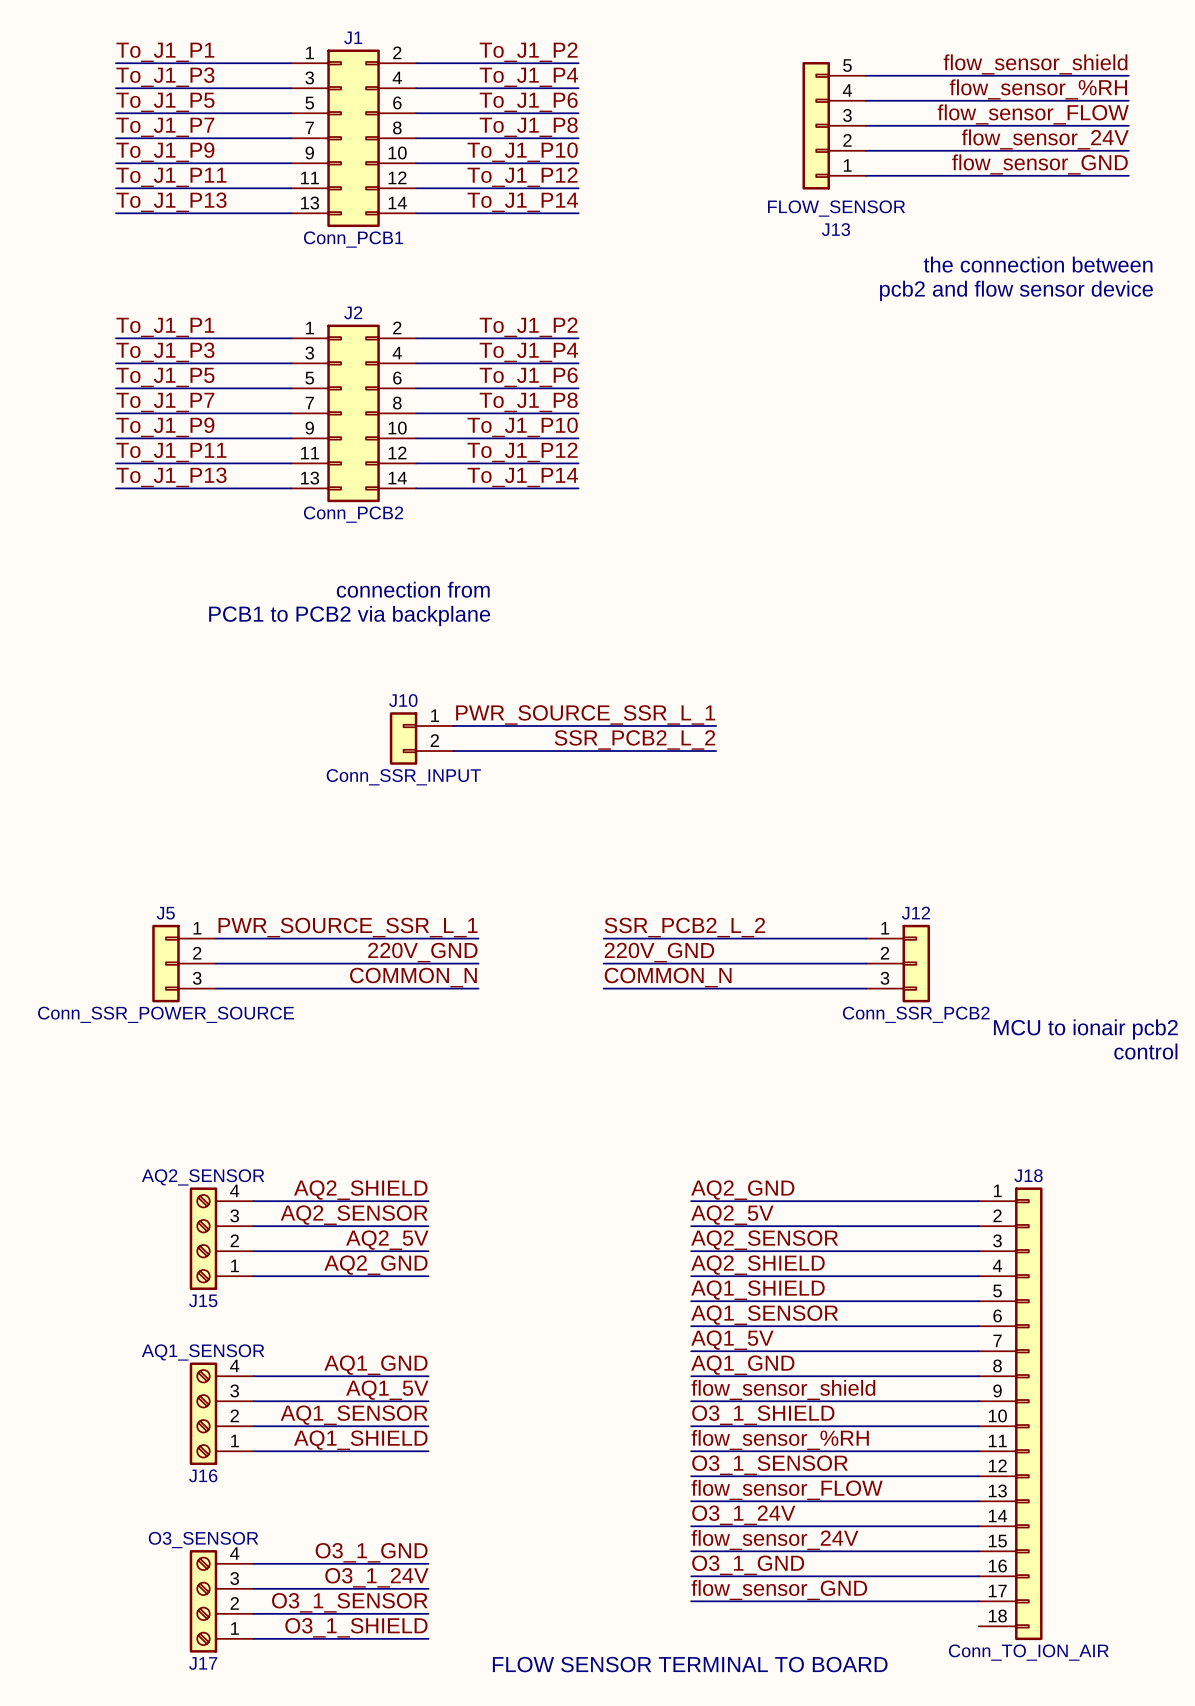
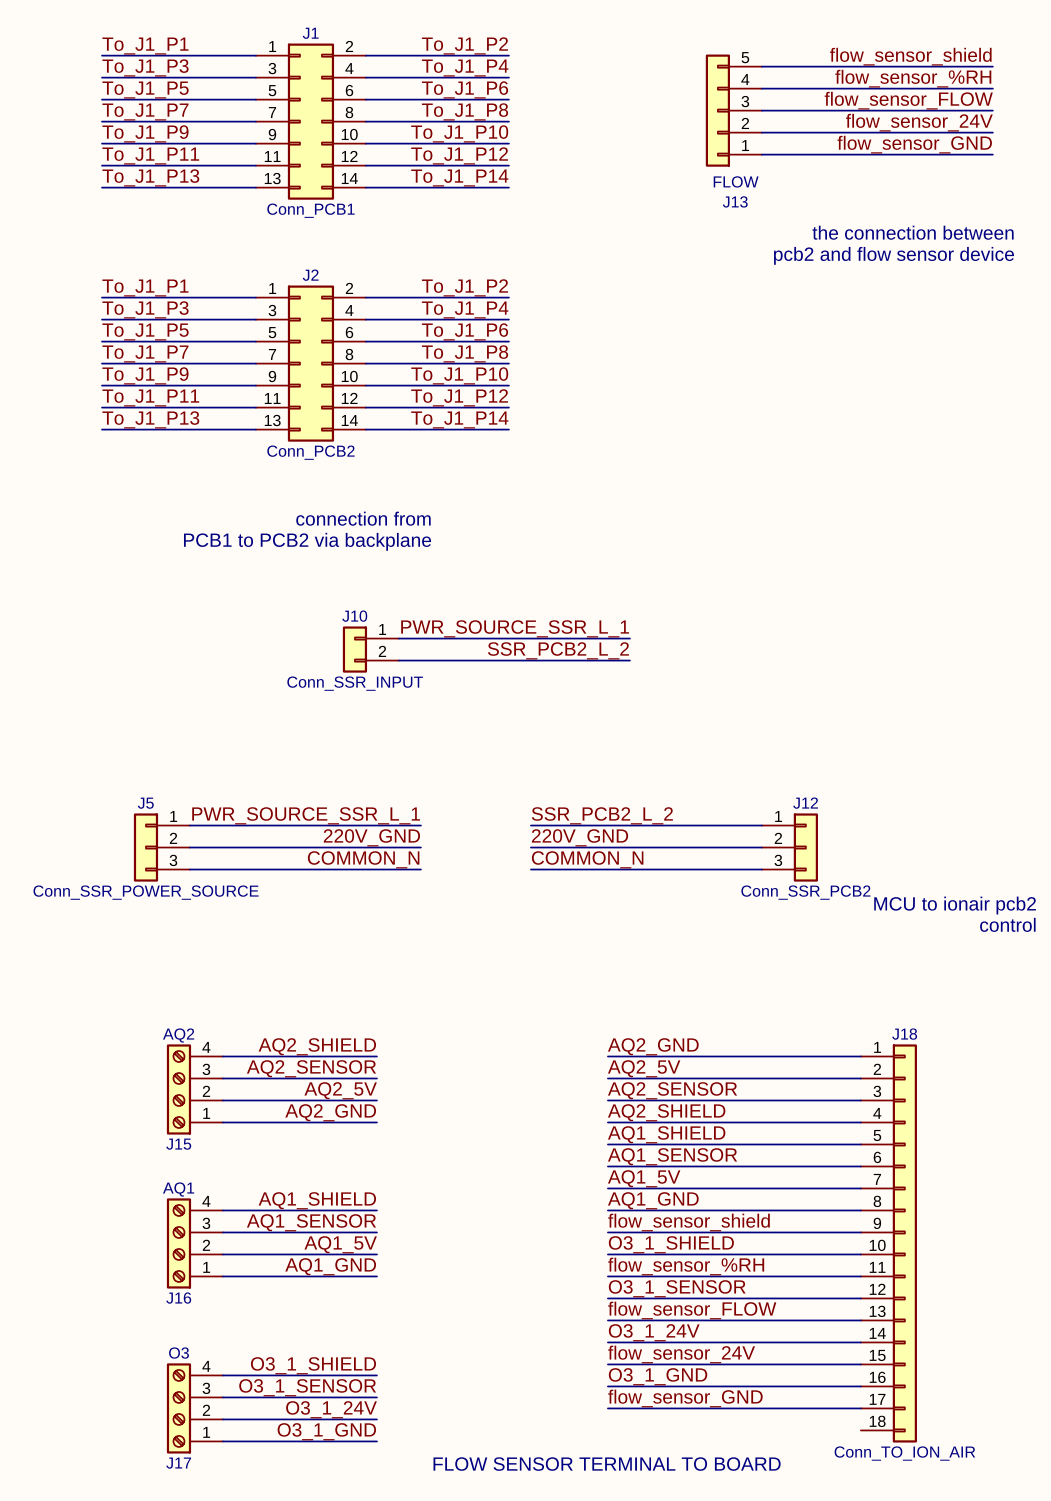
J13 value: FLOW_SENSOR (836, 208) -> FLOW (736, 181)
J15 value: AQ2_SENSOR (203, 1177) -> AQ2 (178, 1035)
J16 value: AQ1_SENSOR (203, 1352) -> AQ1 (178, 1189)
label: AQ1_GND (375, 1365) -> AQ1_SHIELD (317, 1200)
label: AQ1_5V (387, 1390) -> AQ1_SENSOR (311, 1222)
label: AQ1_SENSOR (354, 1415) -> AQ1_5V (340, 1244)
label: AQ1_SHIELD (360, 1440) -> AQ1_GND (330, 1266)
J17 value: O3_SENSOR (203, 1540) -> O3 (179, 1353)
label: O3_1_GND (371, 1552) -> O3_1_SHIELD (313, 1365)
label: O3_1_24V (376, 1577) -> O3_1_SENSOR (307, 1387)
label: O3_1_SENSOR (349, 1602) -> O3_1_24V (331, 1409)
label: O3_1_SHIELD (356, 1627) -> O3_1_GND (326, 1431)

